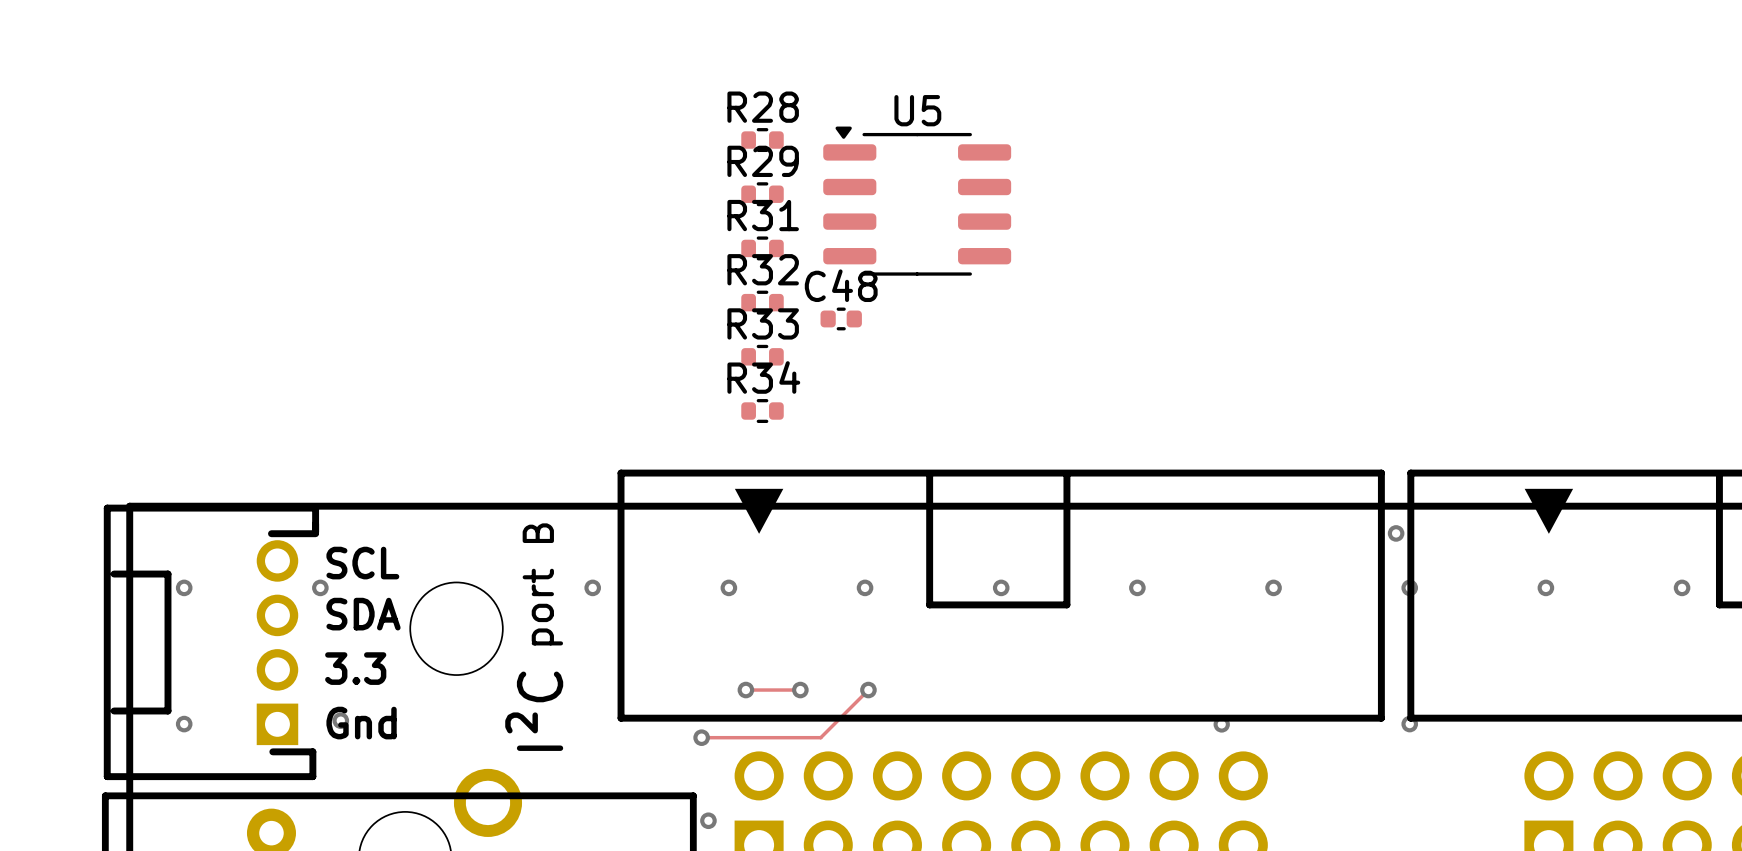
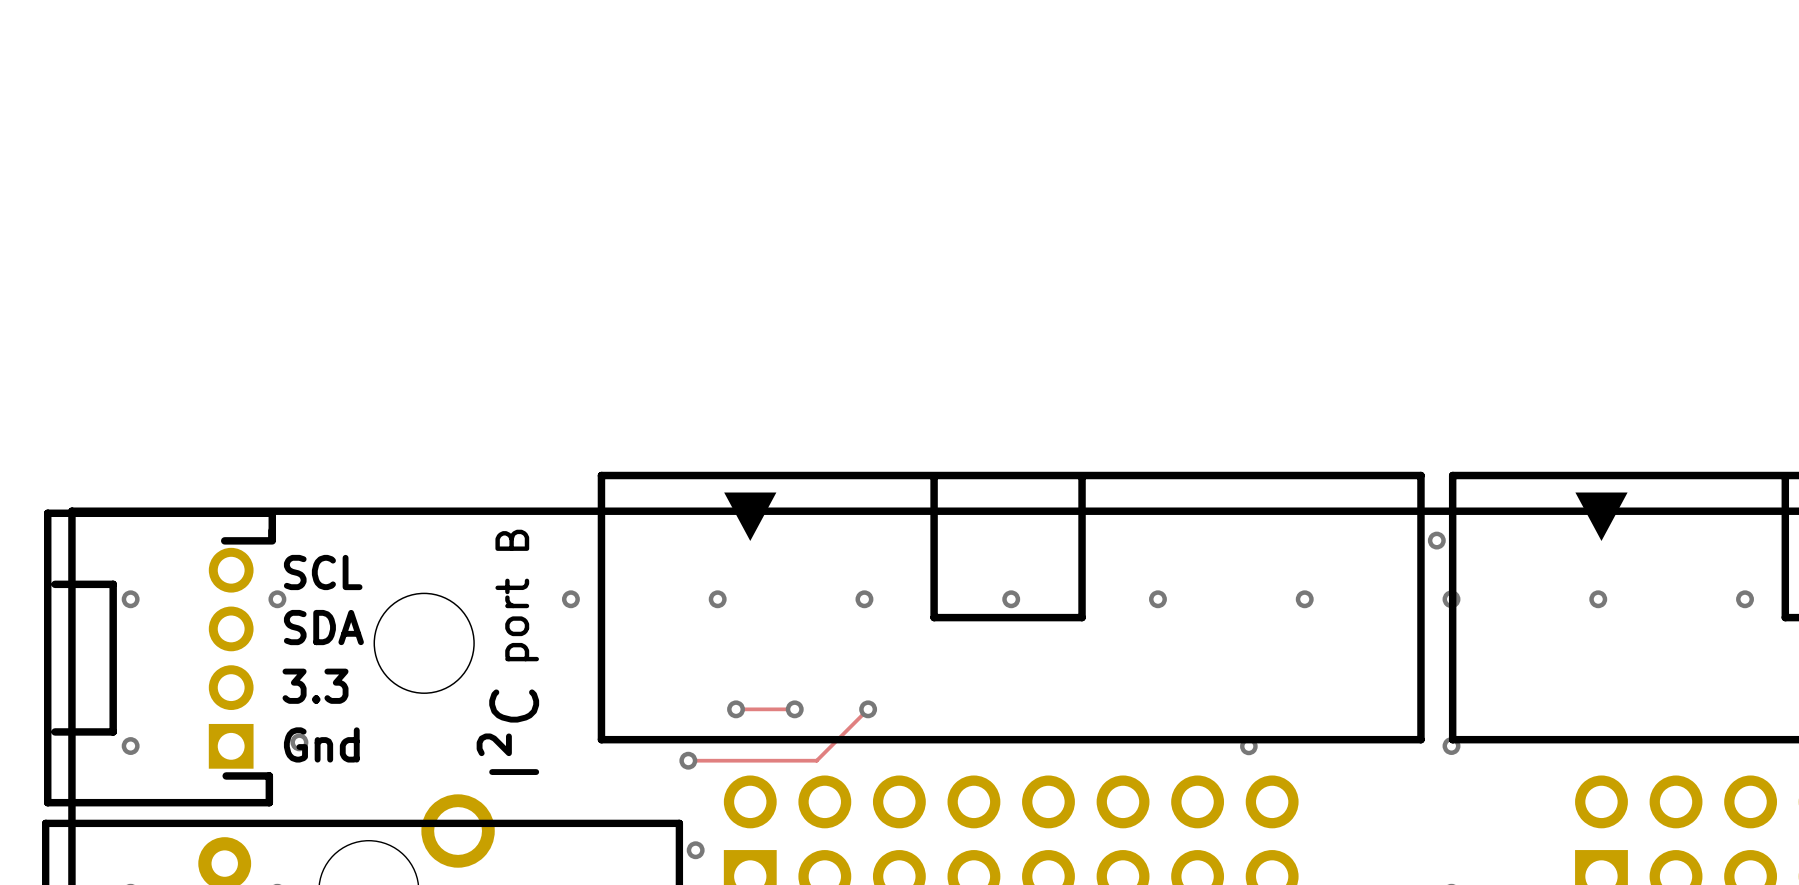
R28: (762, 140) -> none
R29: (762, 194) -> none
U5: (917, 201) -> none
R31: (762, 248) -> none
R32: (762, 302) -> none
C48: (841, 318) -> none
R33: (762, 356) -> none
R34: (762, 411) -> none

